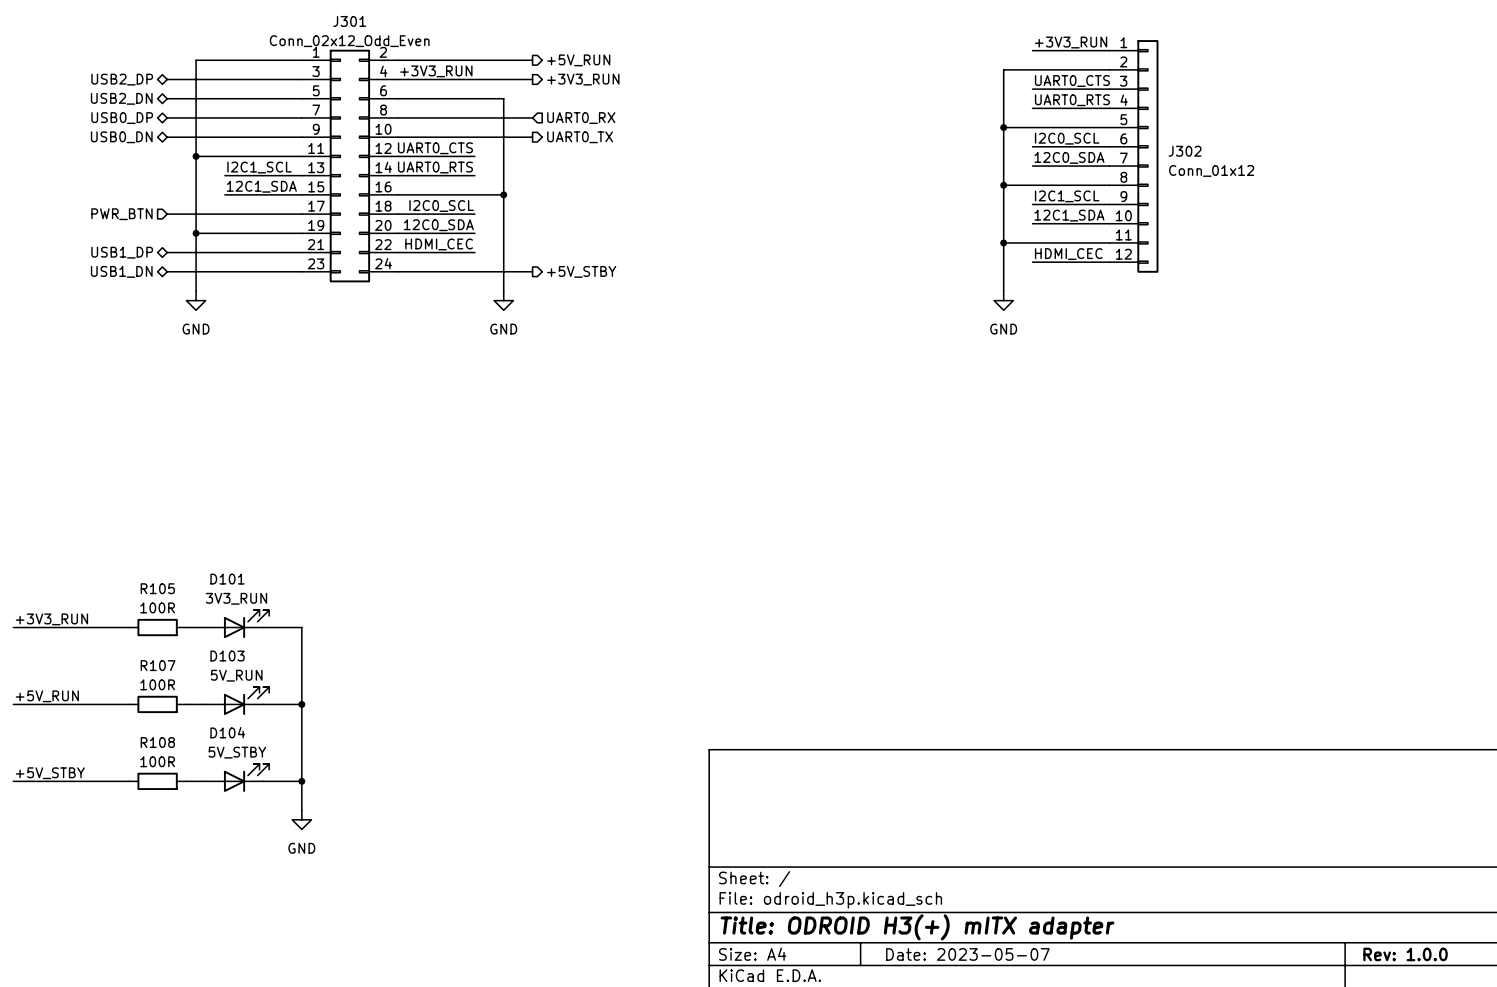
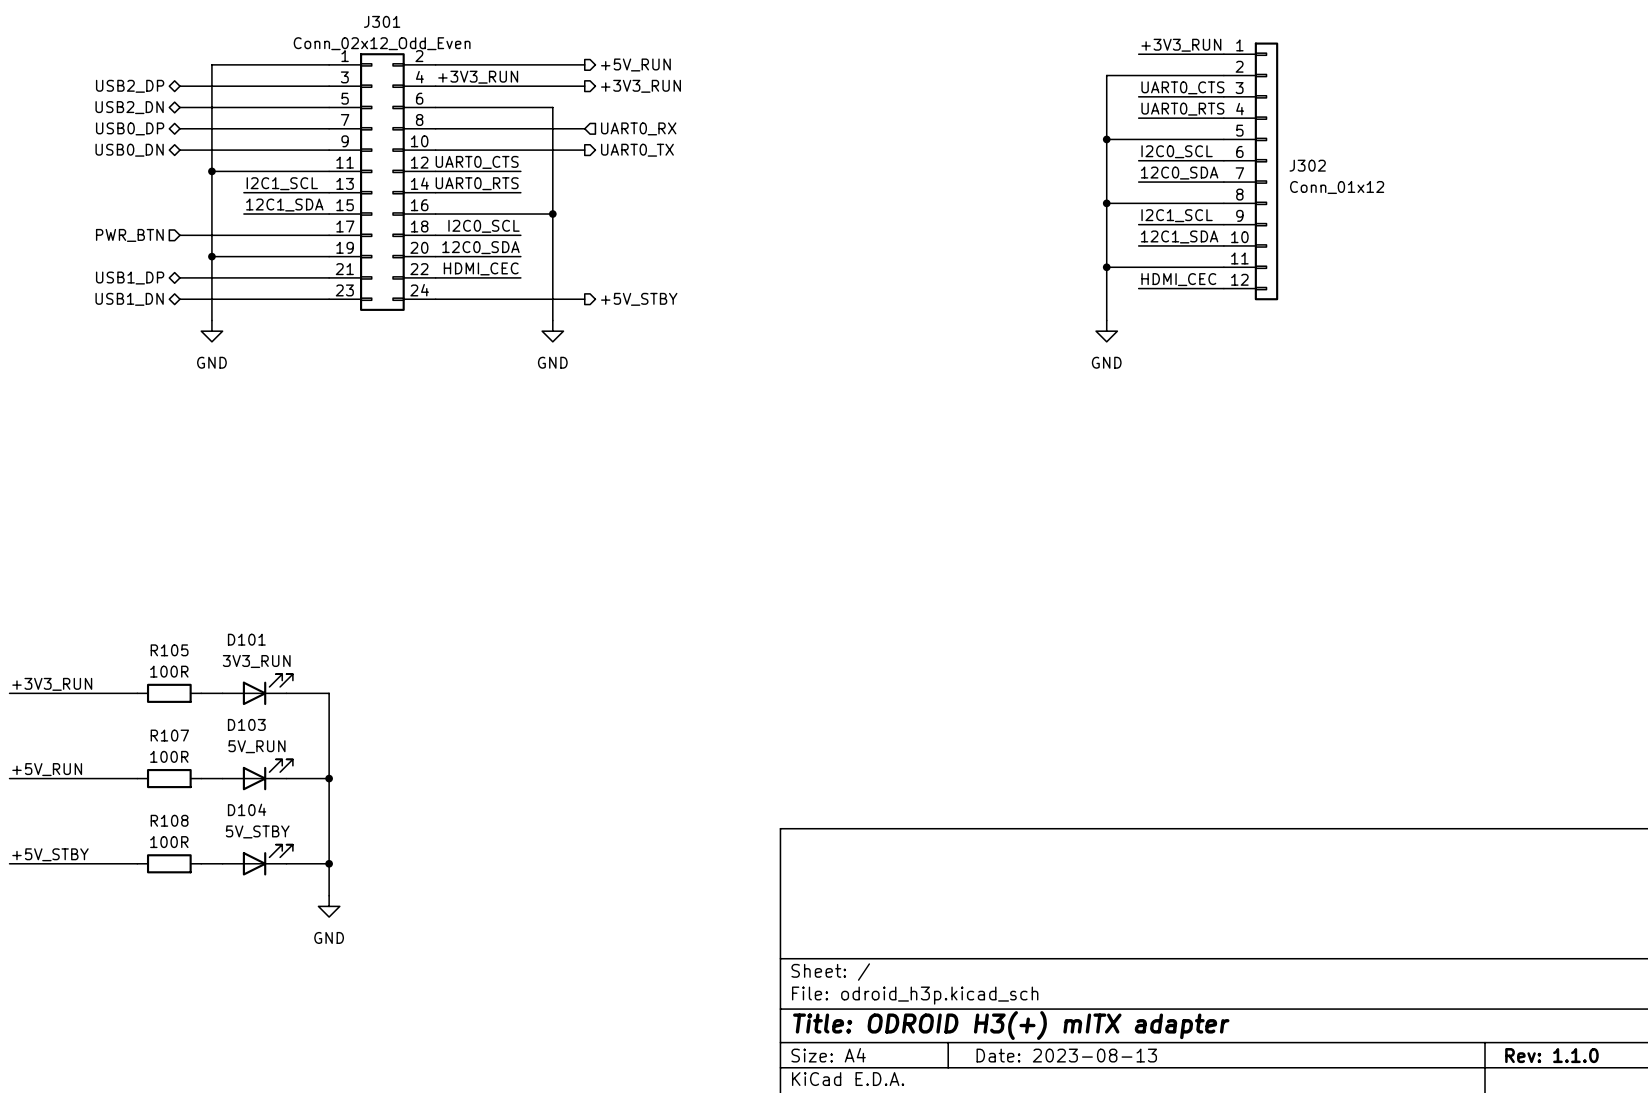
title block: Date: 2023-05-07 (967, 954) -> Date: 2023-08-13 (1066, 1055)
title block: Rev: 1.0.0 (1405, 954) -> Rev: 1.1.0 (1551, 1055)

